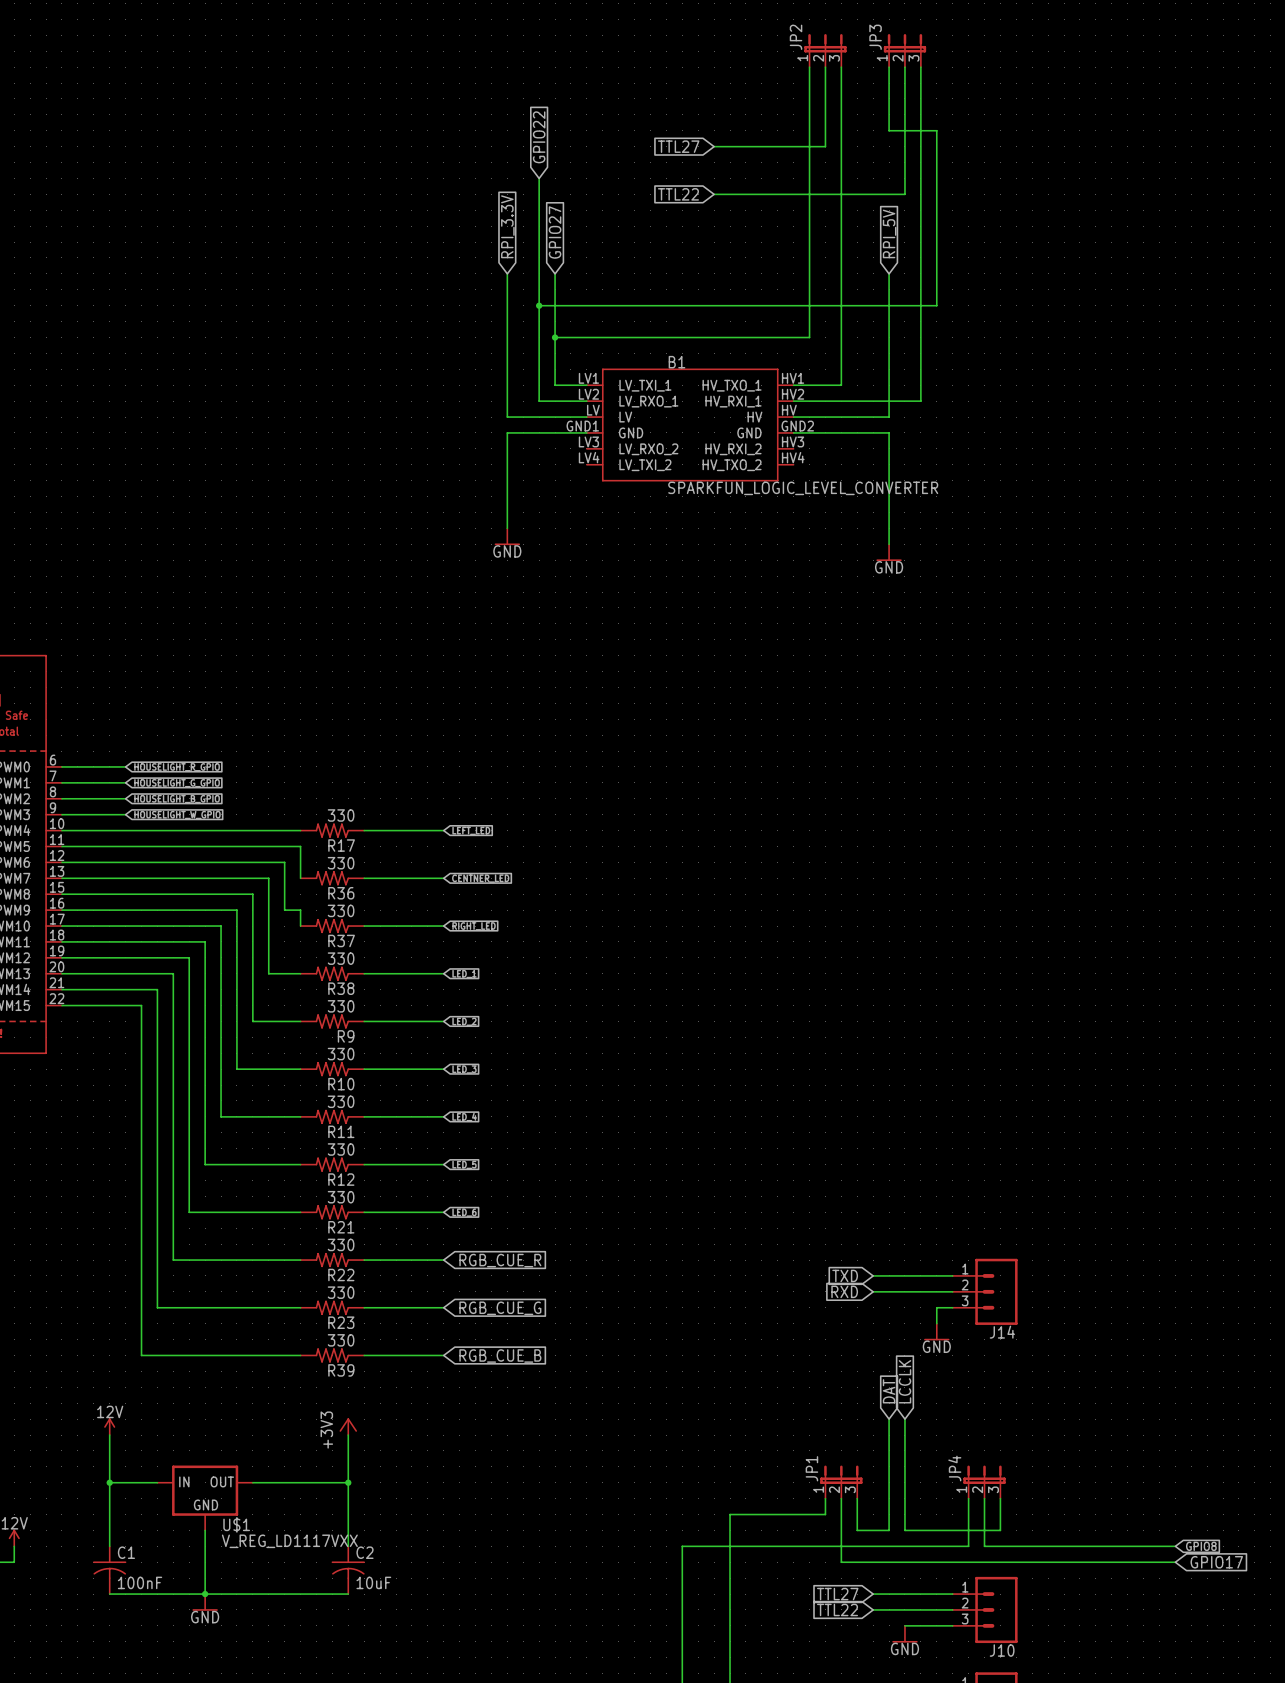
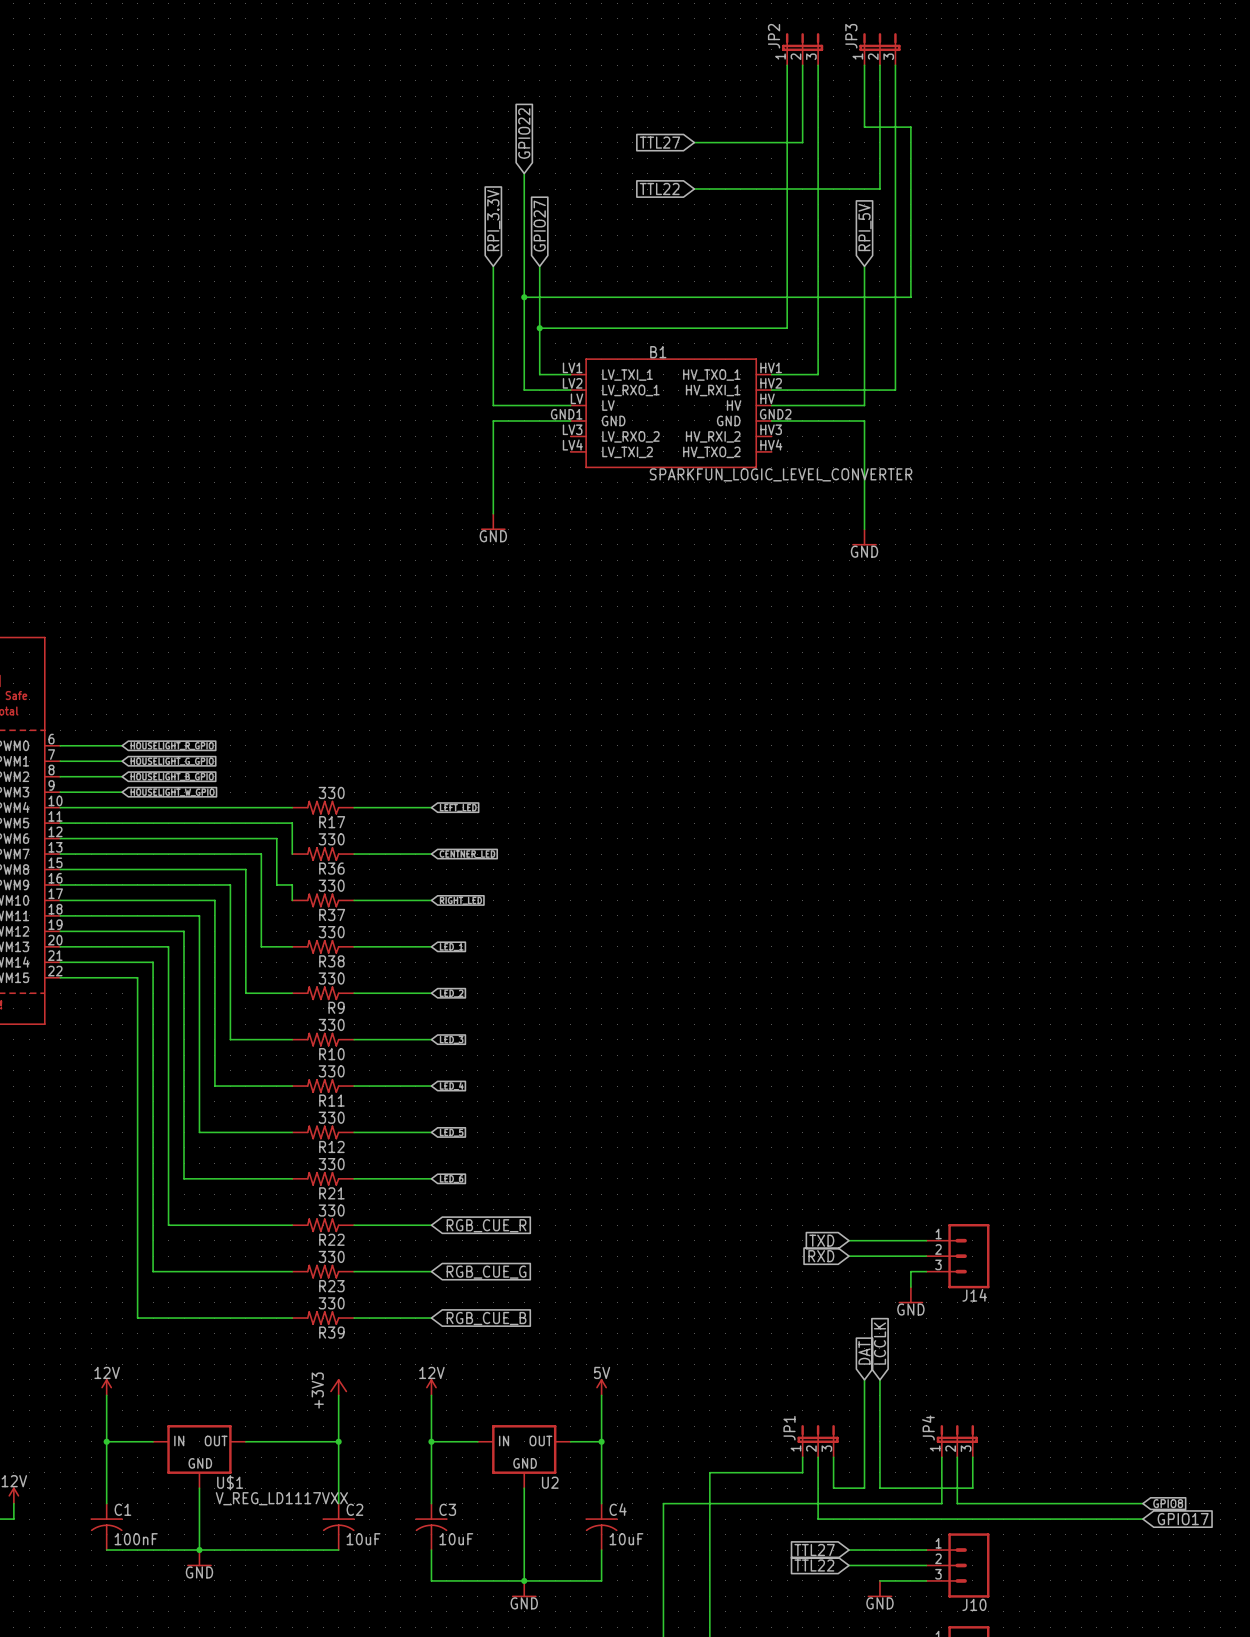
power symbol: none -> 12V (431, 1387)
power symbol: none -> 5V (601, 1387)
wire: none -> (431, 1395) (431, 1503)
wire: none -> (601, 1395) (601, 1503)
wire: none -> (431, 1441) (477, 1441)
junction: none -> (431, 1441)
wire: none -> (570, 1441) (601, 1441)
junction: none -> (601, 1441)
U2: none -> (524, 1456)
wire: none -> (524, 1488) (524, 1580)
C3: none -> 10uF (431, 1526)
C4: none -> 10uF (601, 1526)
wire: none -> (431, 1550) (431, 1580) (601, 1580) (601, 1550)
junction: none -> (524, 1580)
power symbol: none -> GND (524, 1589)

